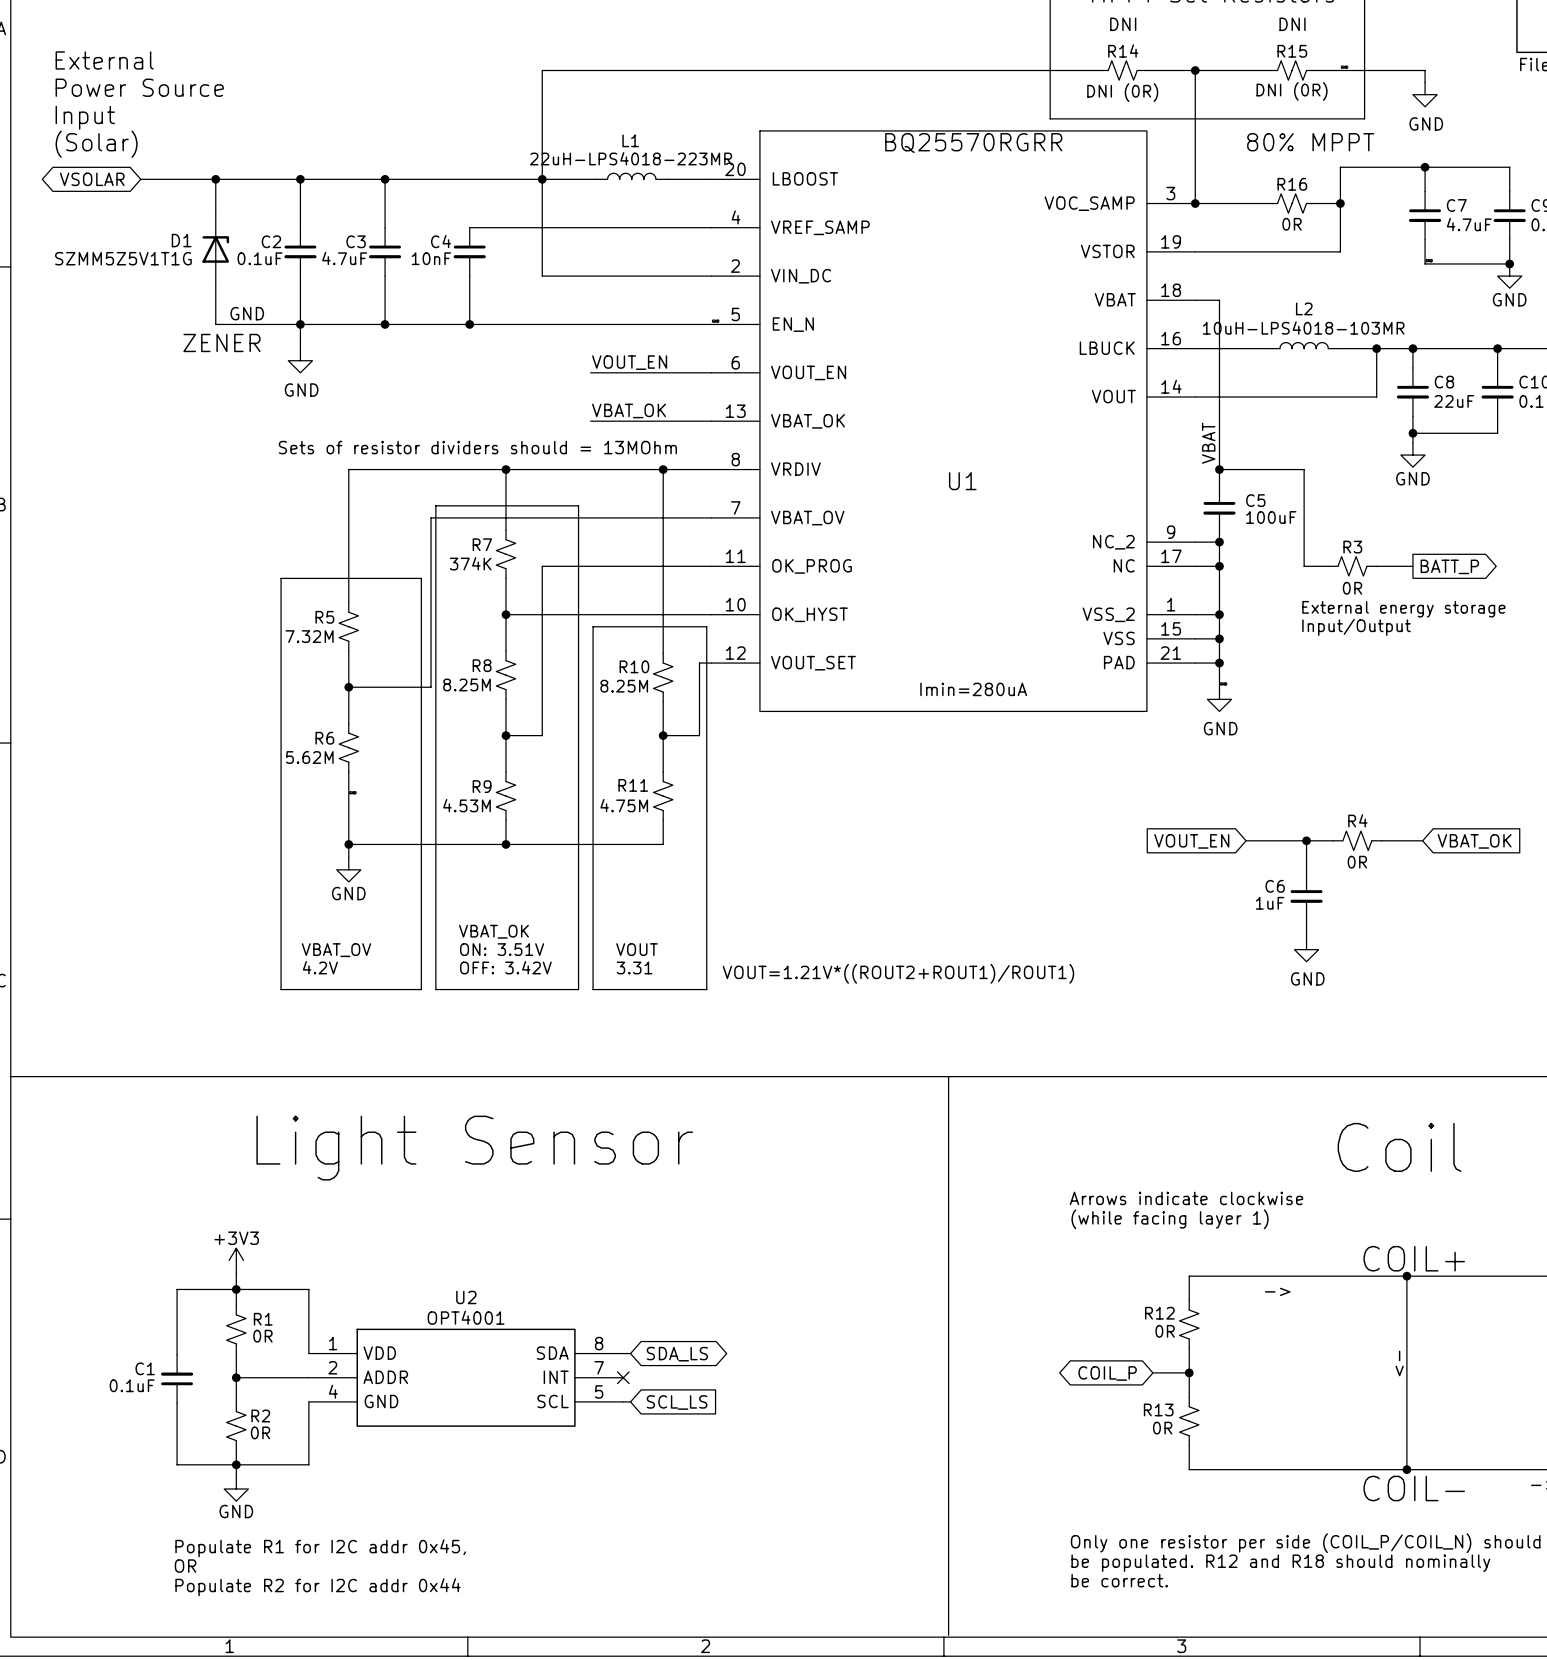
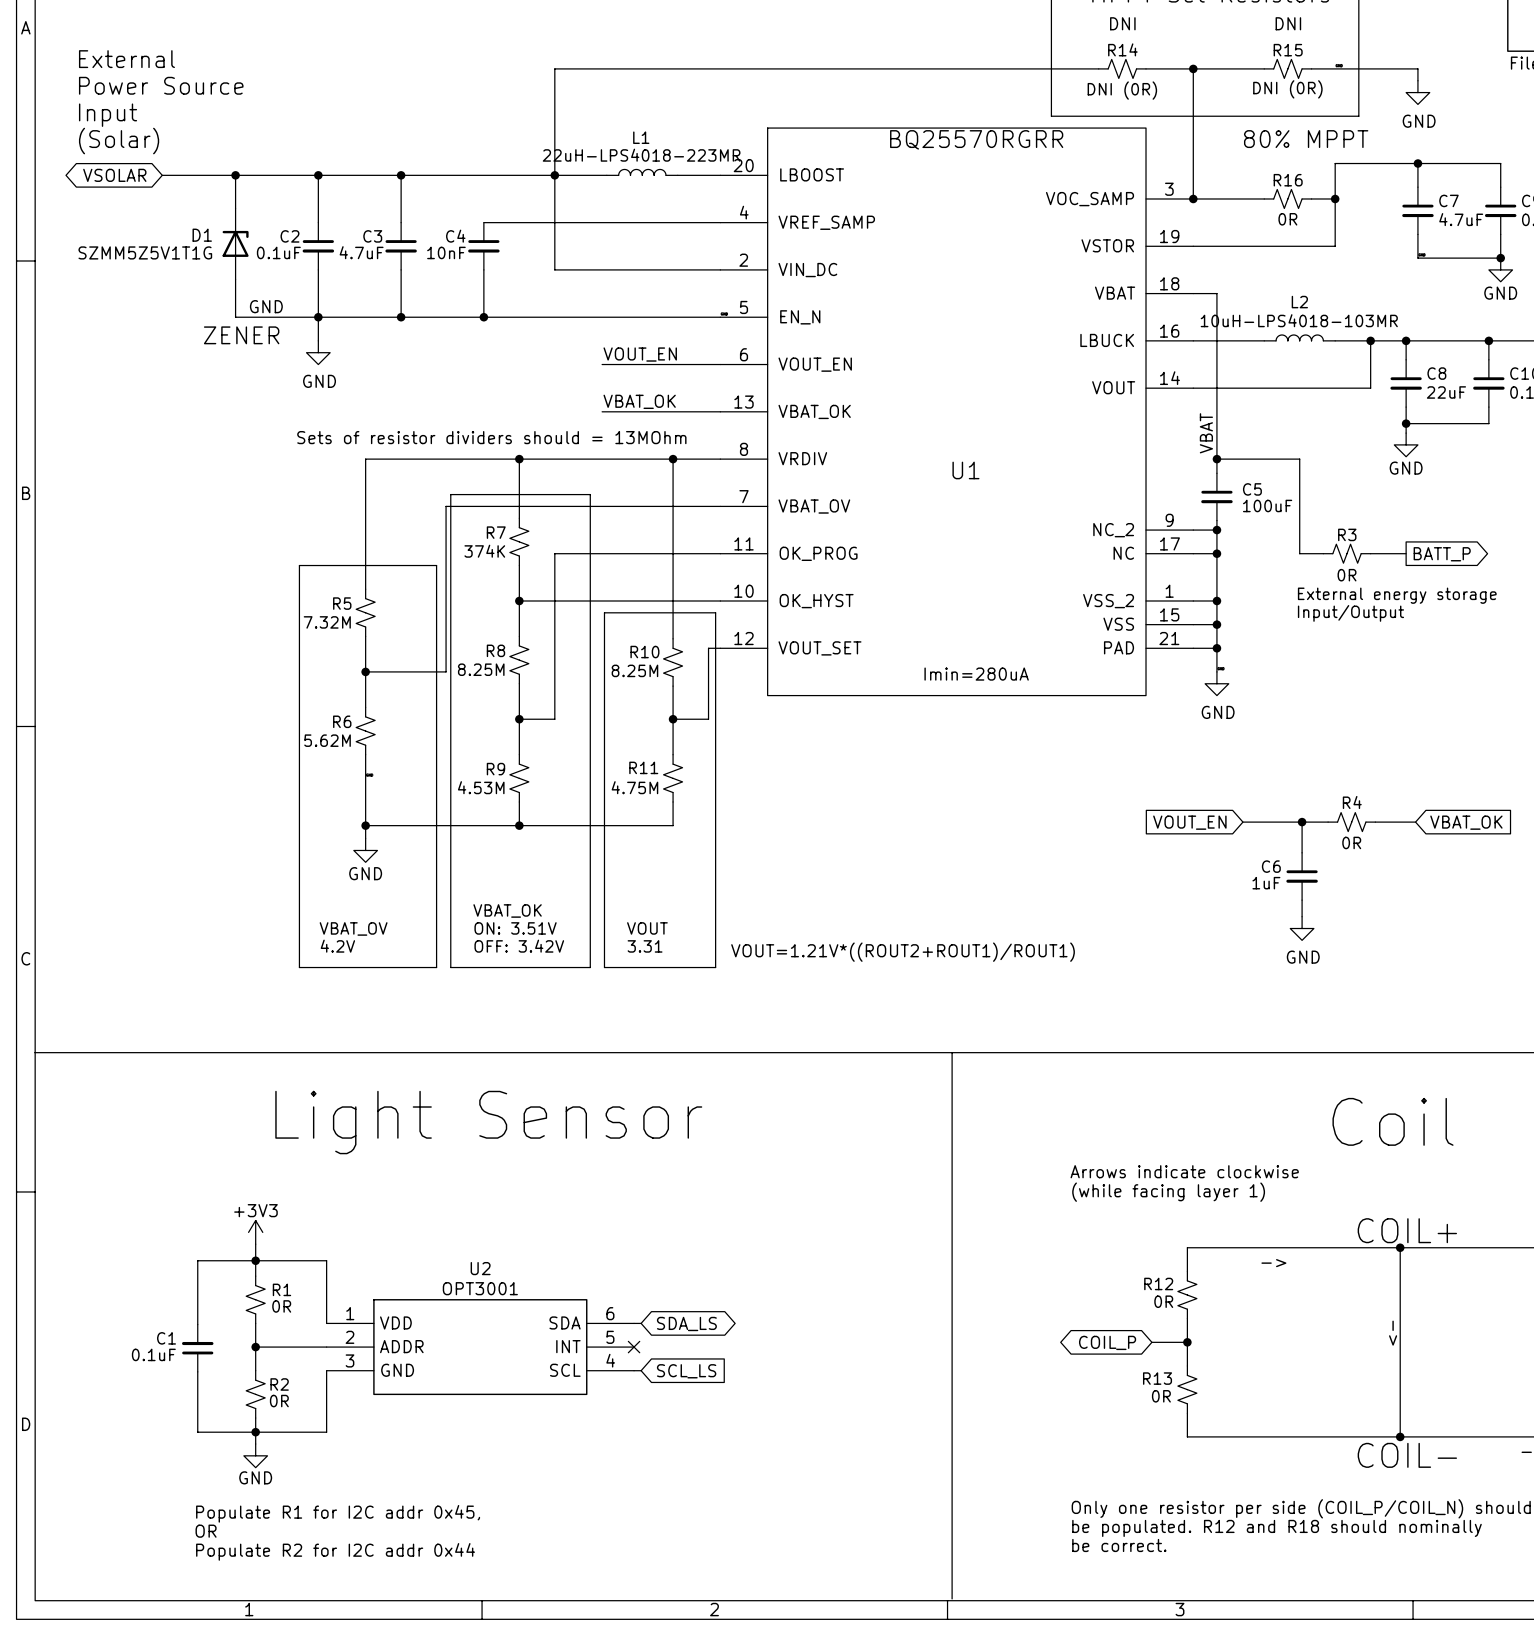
U2 value: OPT4001 (466, 1317) -> OPT3001 (480, 1288)
U2 pin number: 8 (599, 1343) -> 6 (610, 1313)
U2 pin number: 7 (599, 1367) -> 5 (610, 1337)
U2 pin number: 4 (333, 1391) -> 3 (349, 1360)
U2 pin number: 5 (599, 1391) -> 4 (610, 1360)

